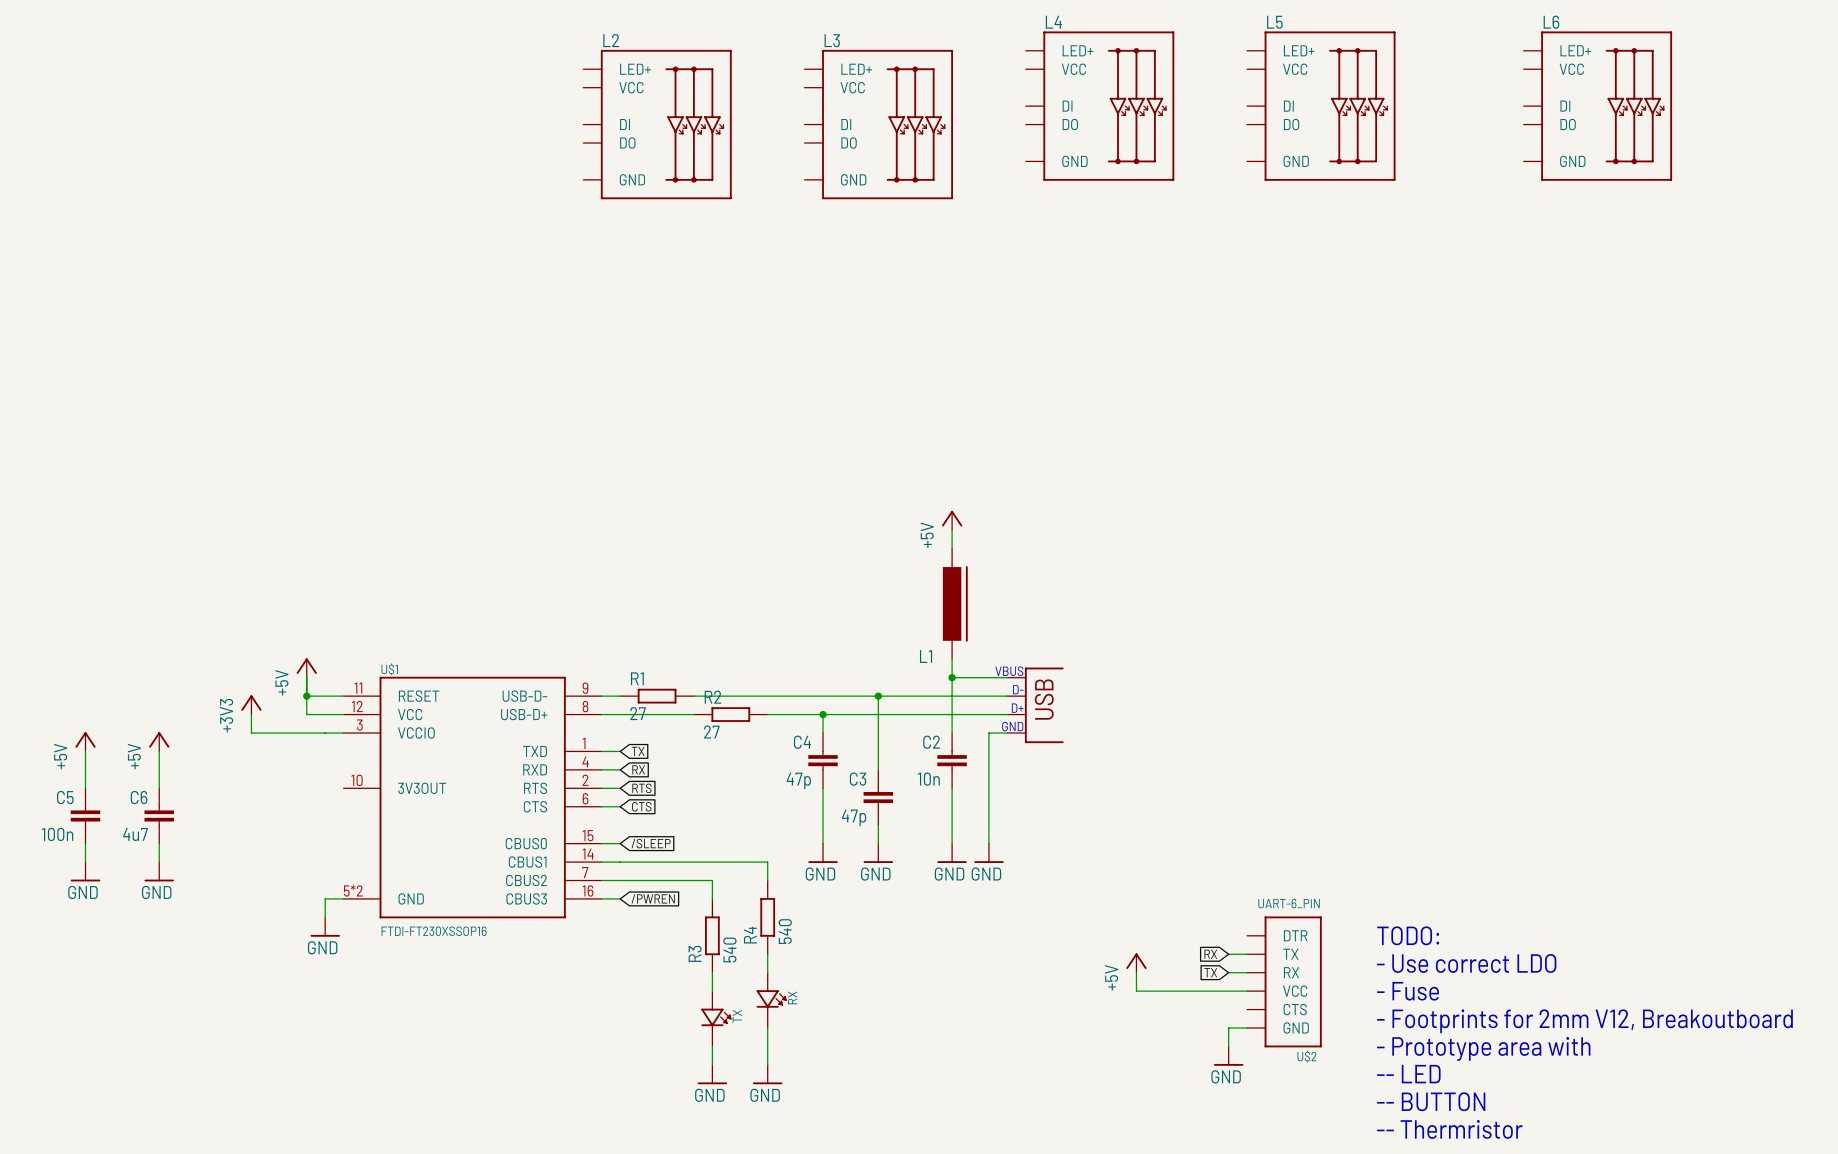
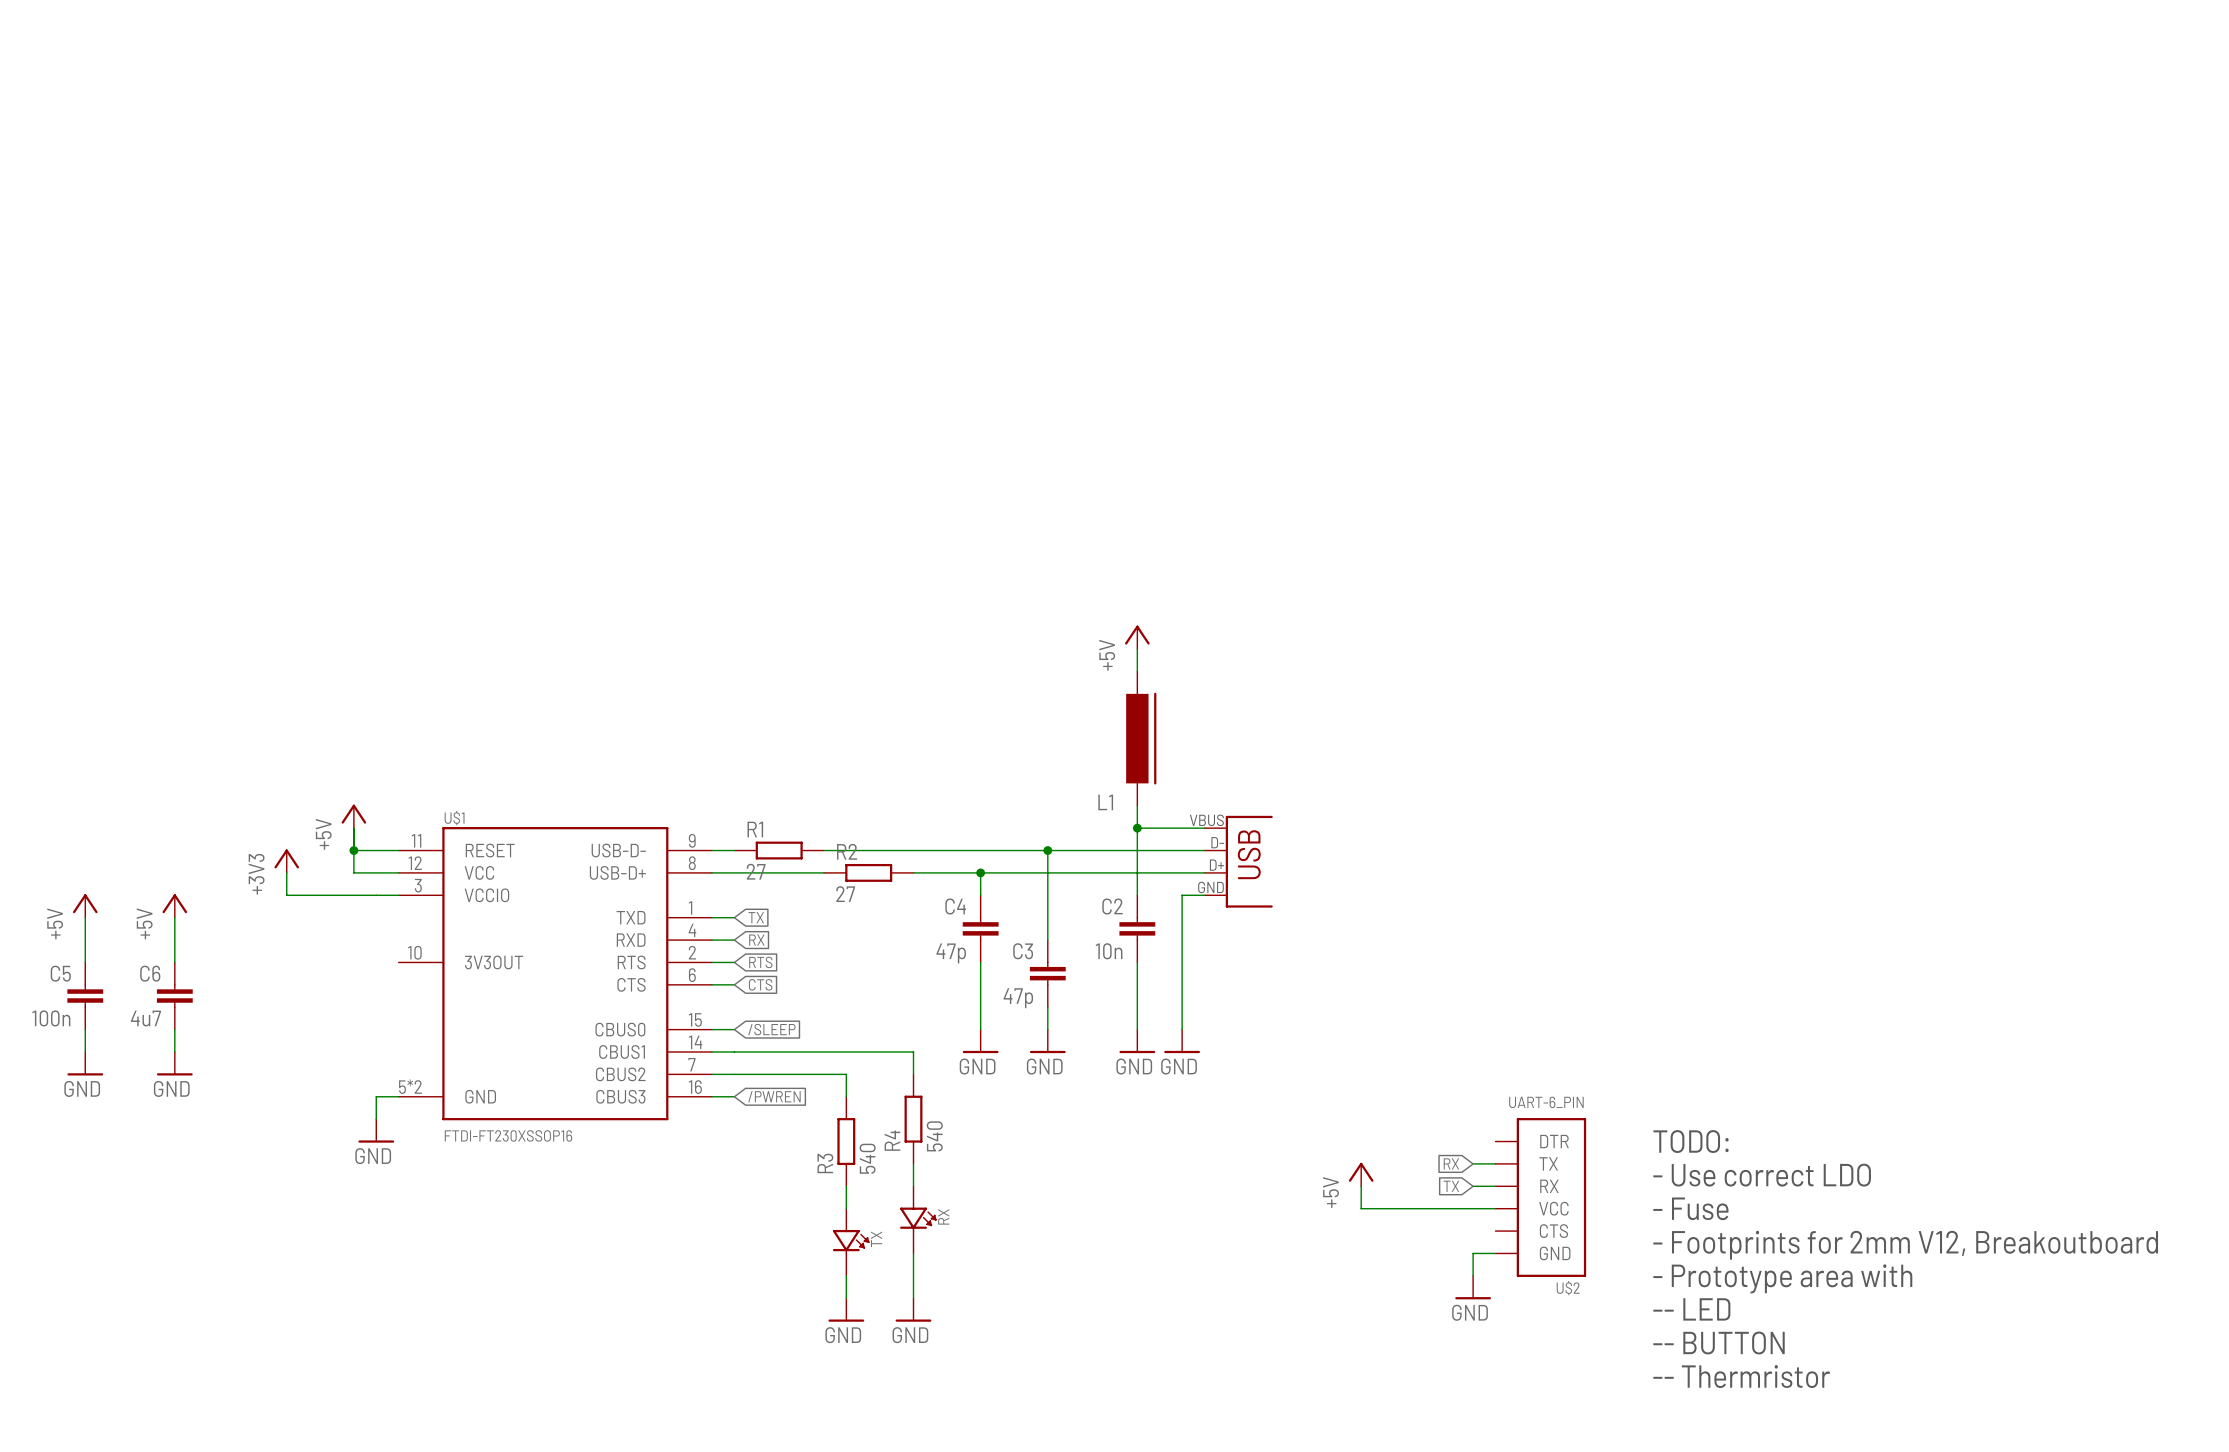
L4: (1100, 106) -> none
L5: (1321, 106) -> none
L6: (1597, 106) -> none
L2: (657, 124) -> none
L3: (878, 124) -> none

